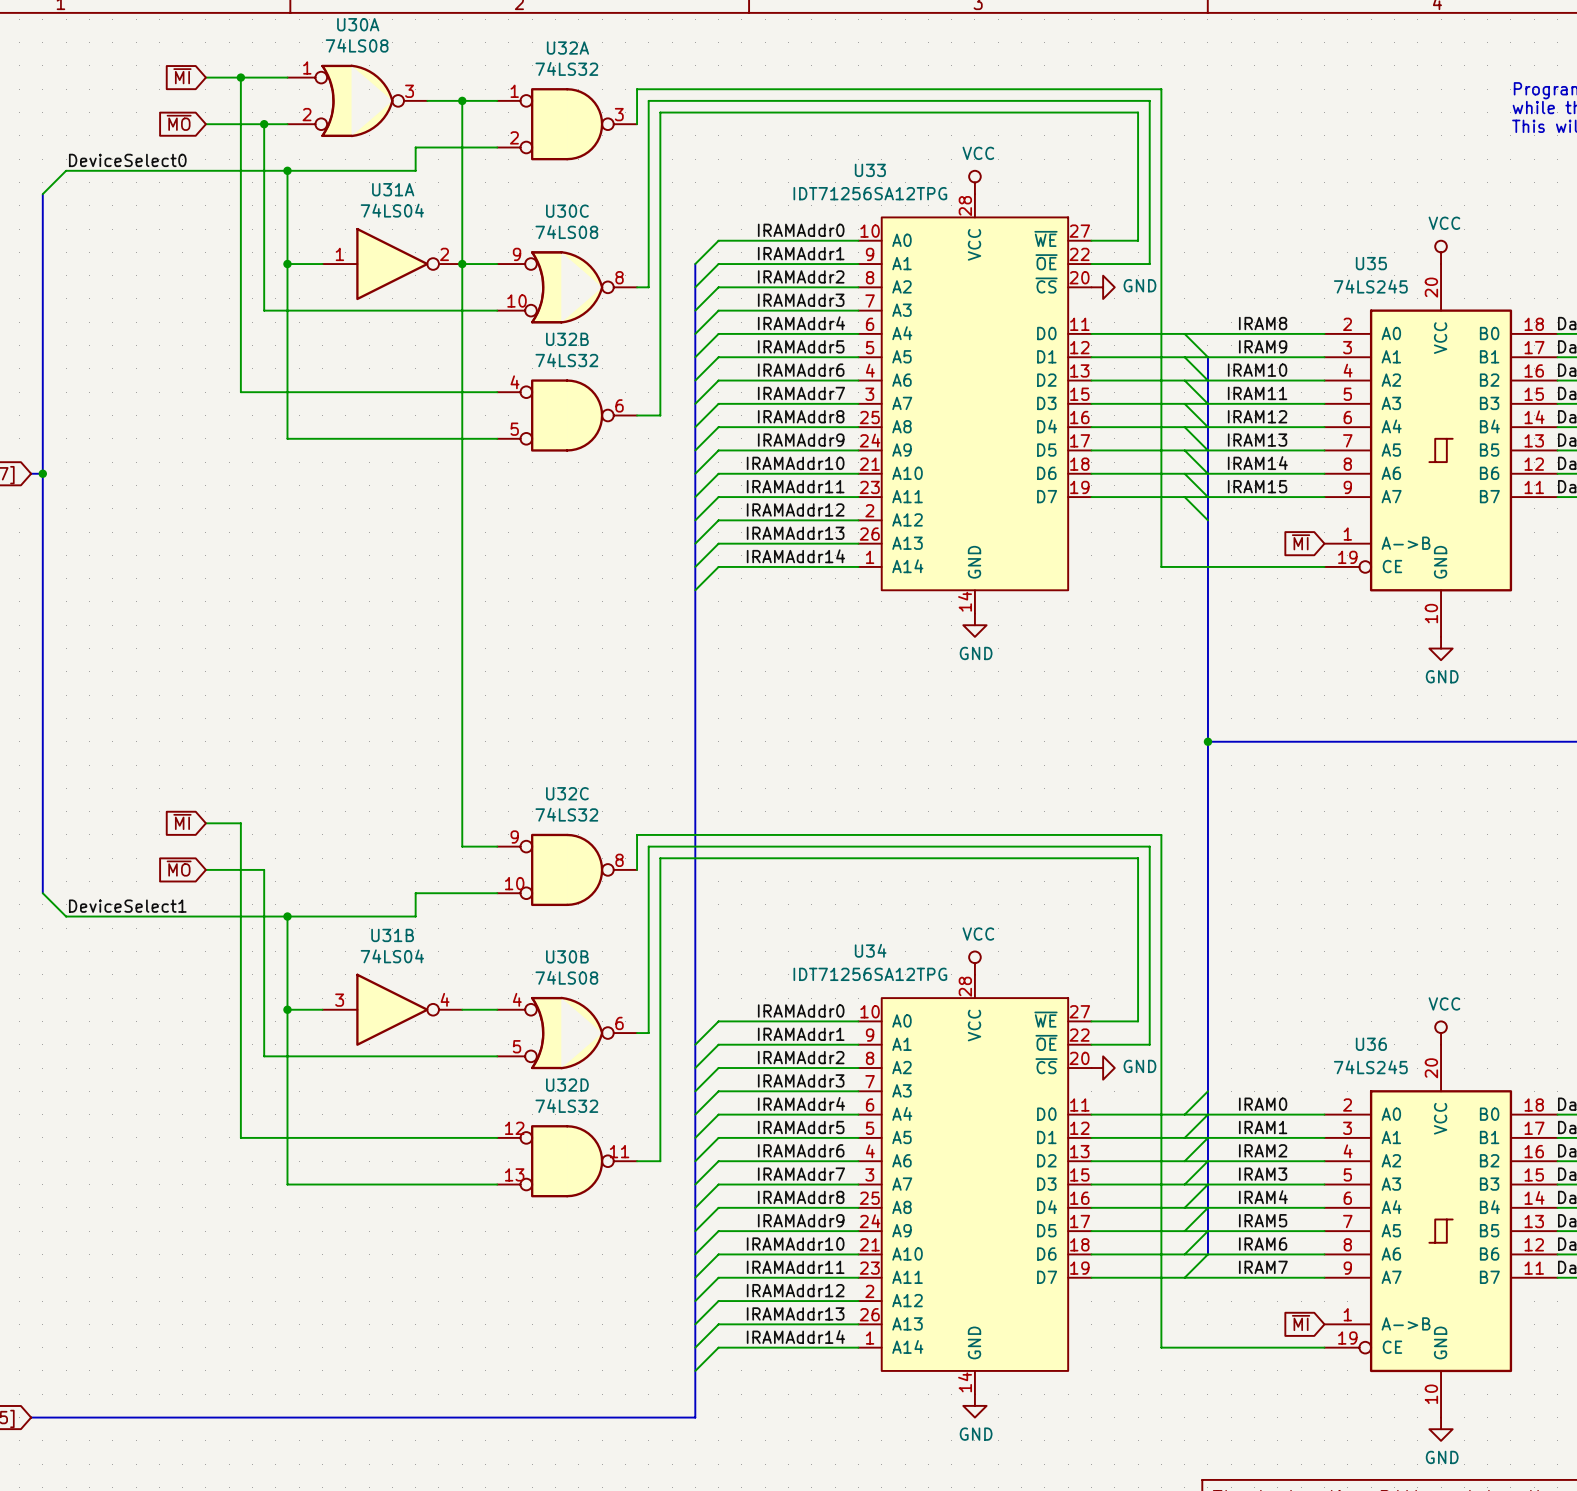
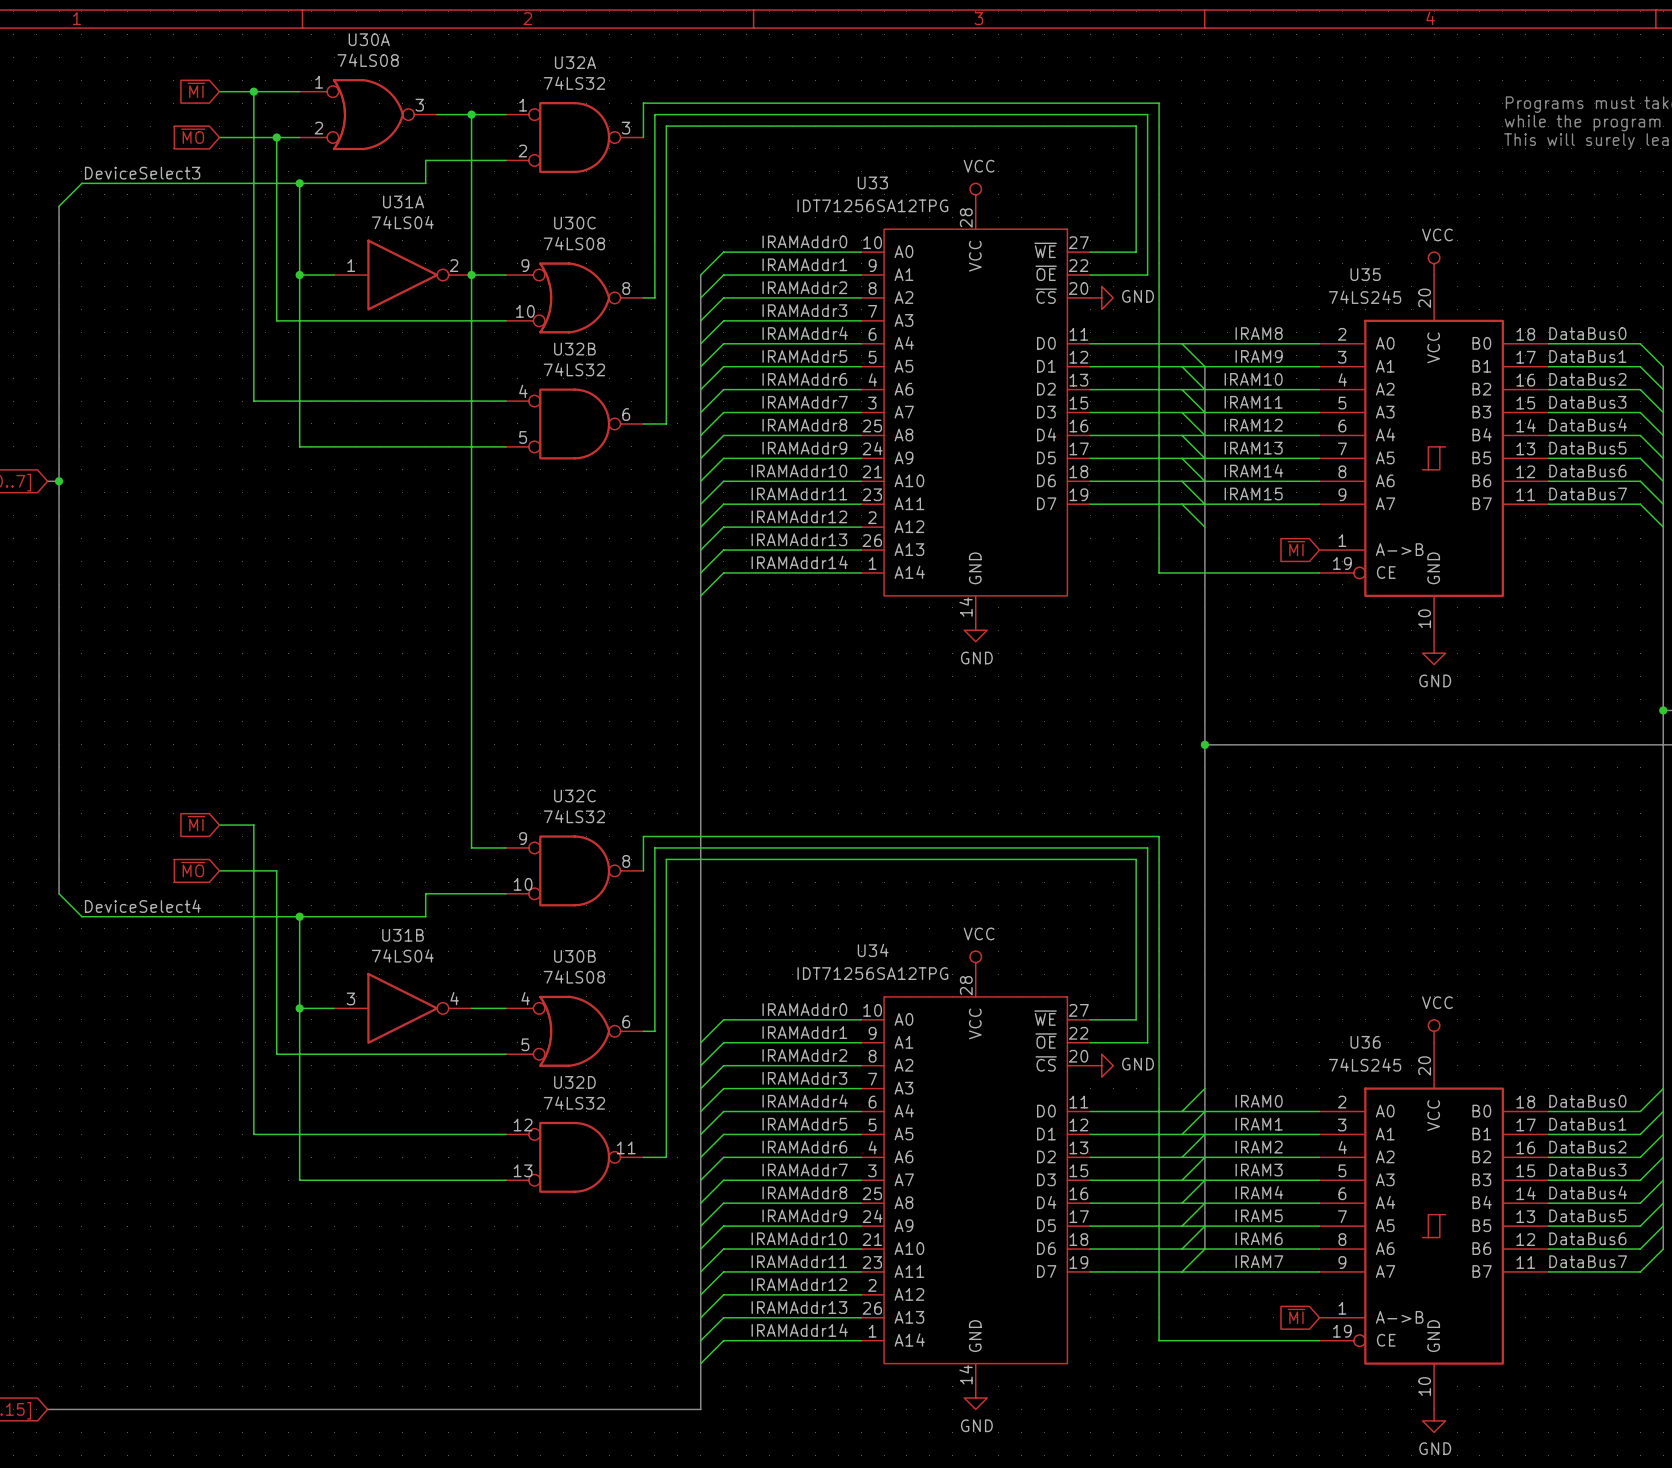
label: DeviceSelect0 (127, 160) -> DeviceSelect3 (142, 173)
label: DeviceSelect1 (127, 906) -> DeviceSelect4 (142, 906)

